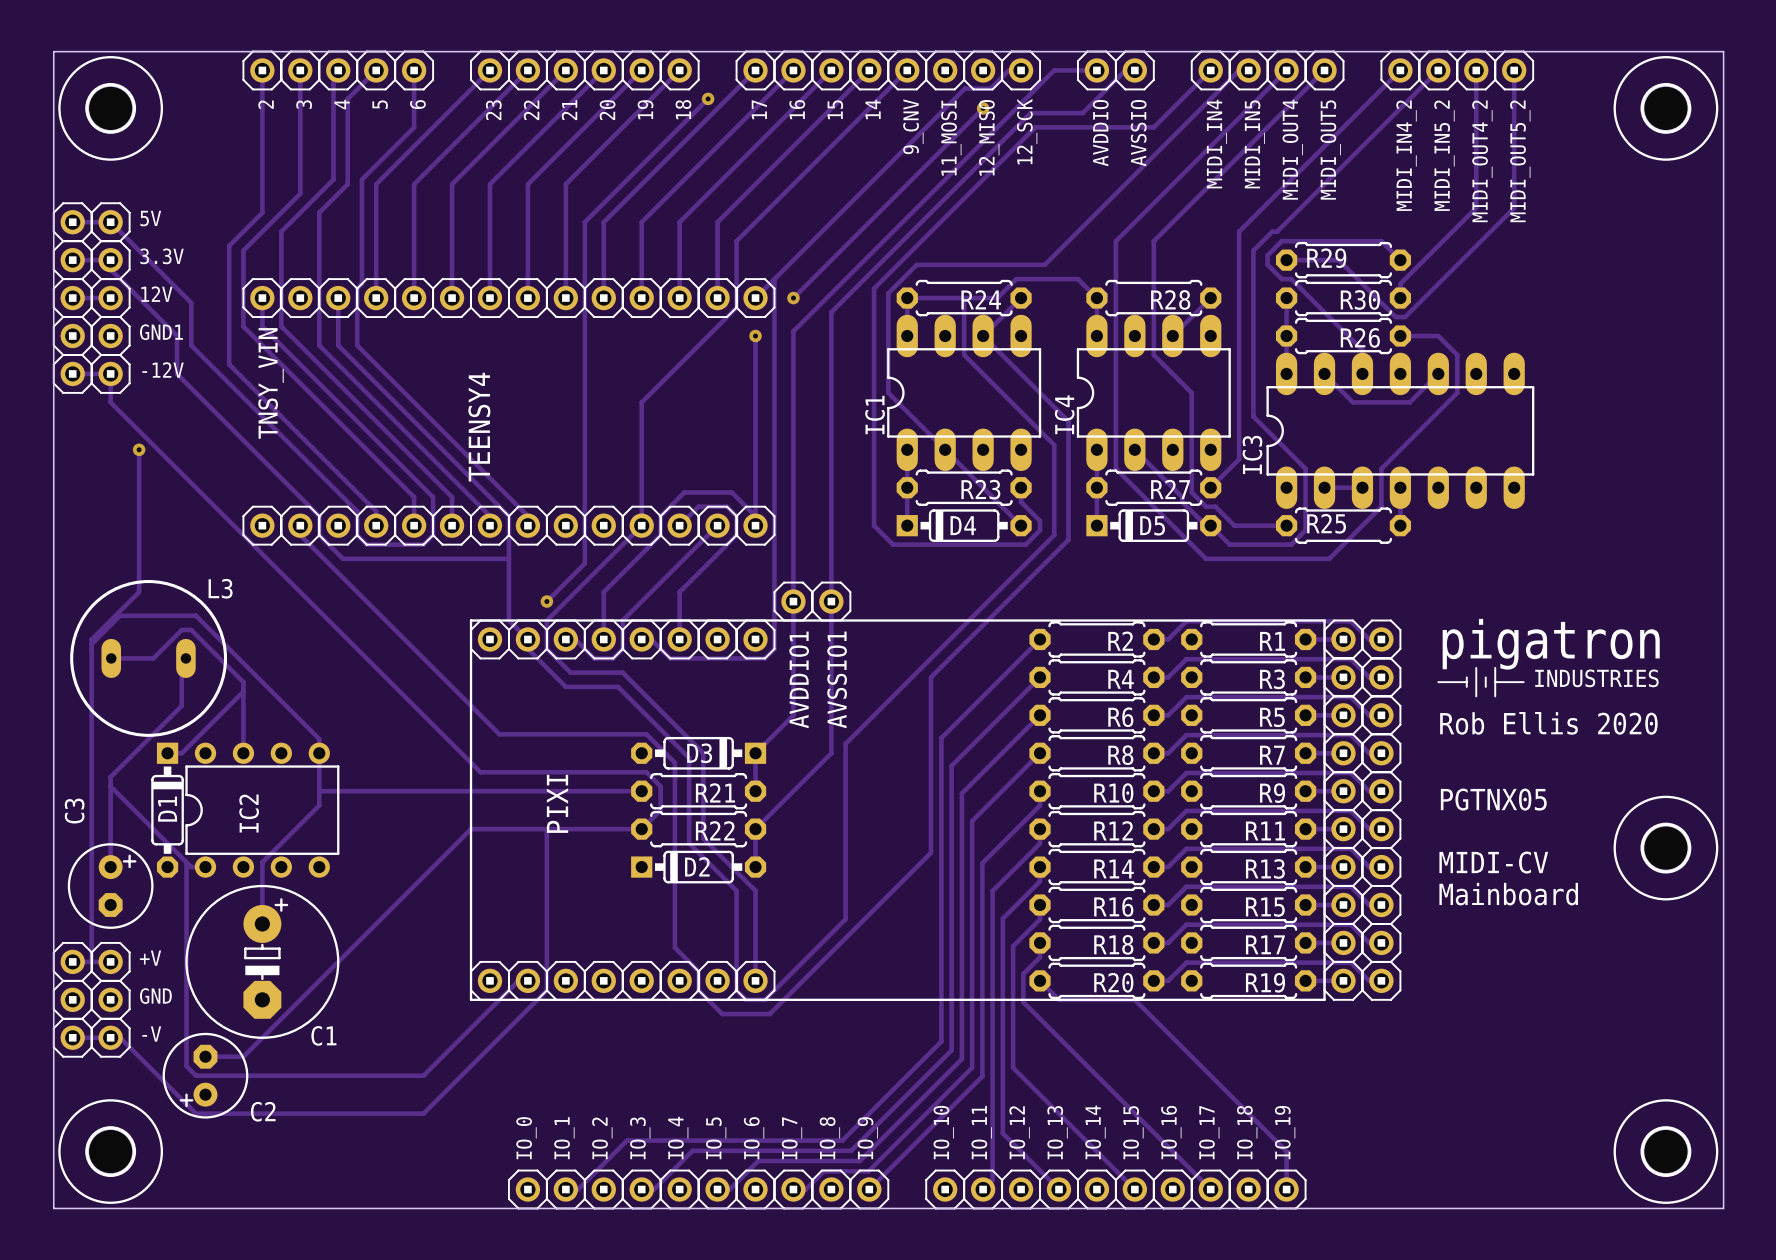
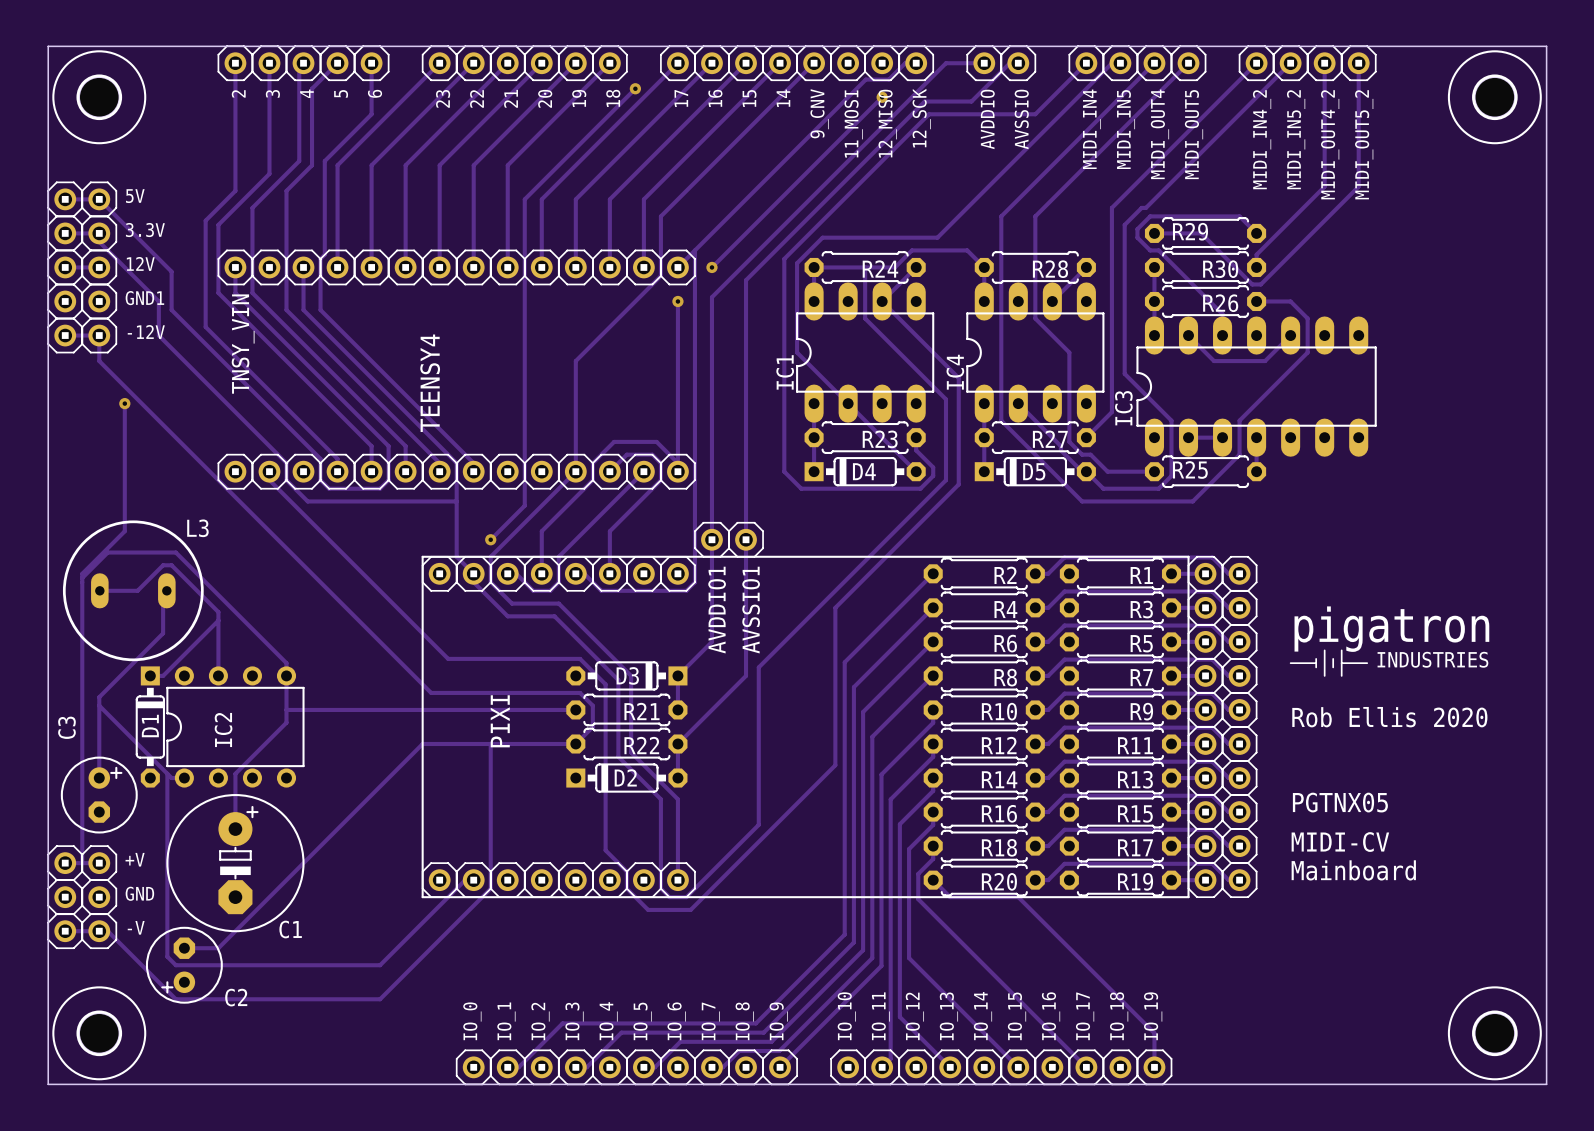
drawing position: (1481, 682) -> (1328, 663)
text: Rob Ellis 2020 (1548, 723) -> none
text: PGTNX05 (1493, 799) -> Rob Ellis 2020 (1389, 717)
part: (1665, 848) -> none
text position: MIDI-CV (1493, 862) -> MIDI-CV (1340, 842)
text: Mainboard (1508, 894) -> PGTNX05 (1340, 802)
text: none -> Mainboard (1353, 870)

